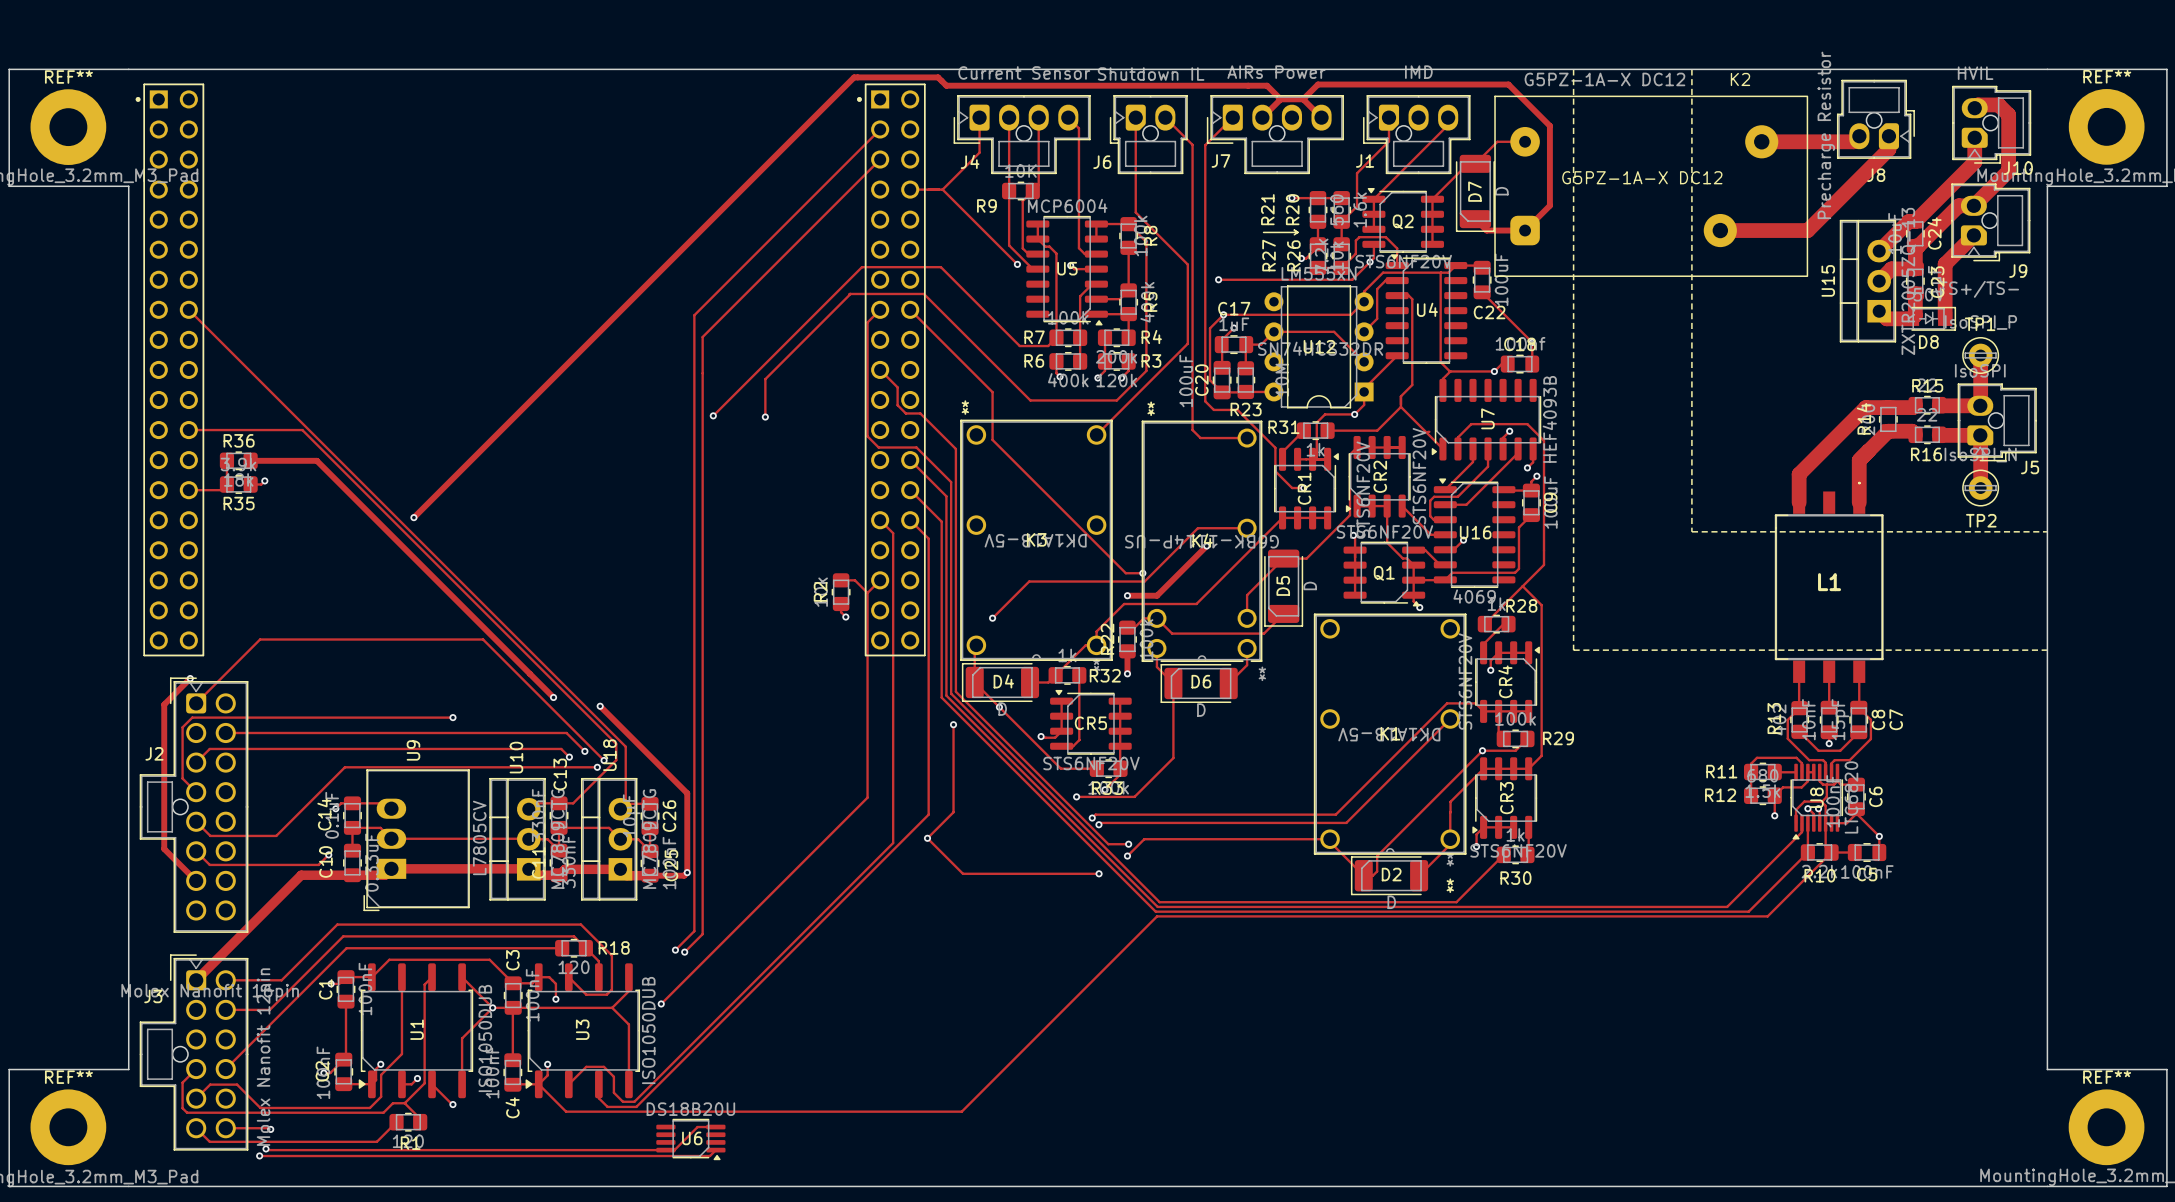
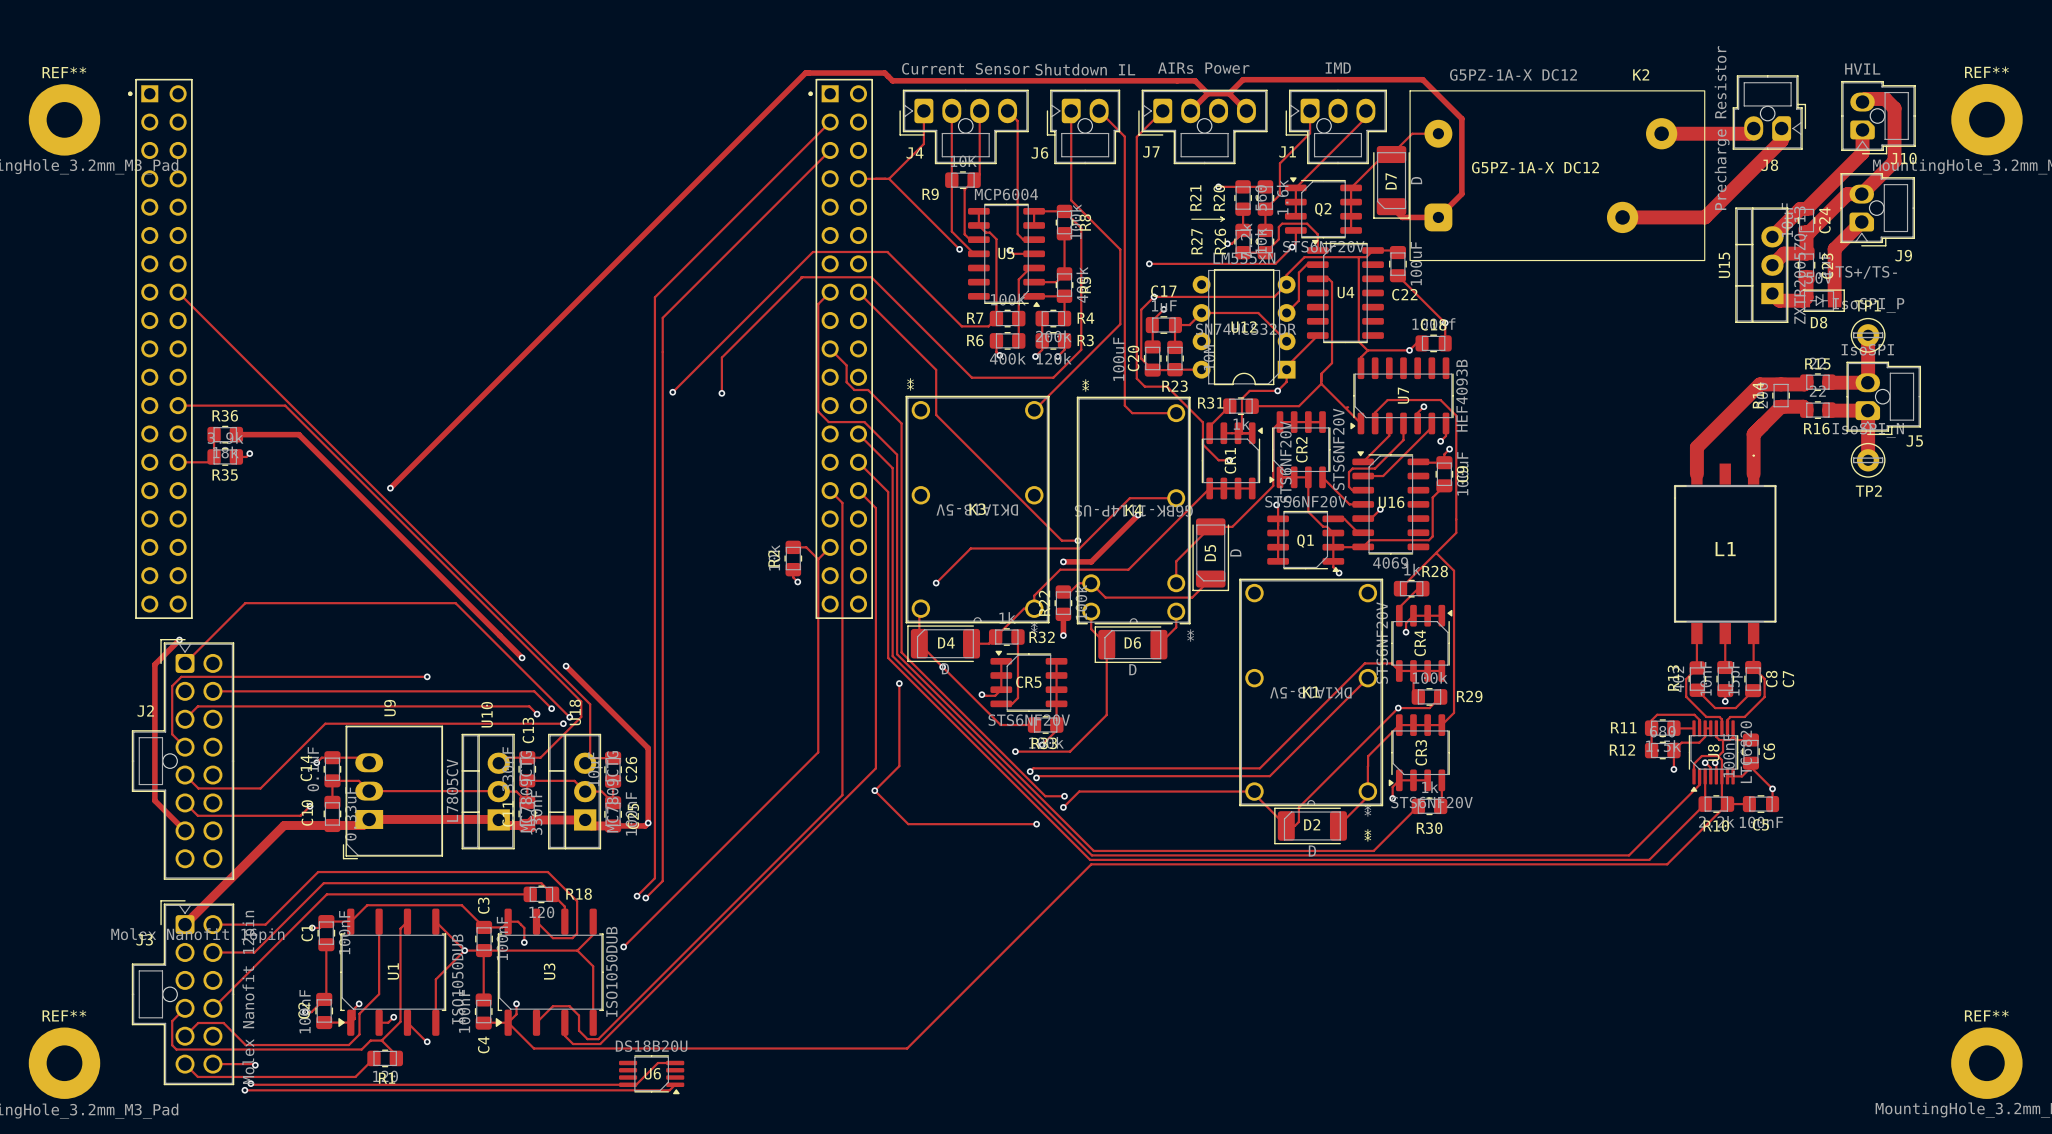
board edge: (9, 69) (9, 186) (128, 186) (128, 1069) (9, 1069) (9, 1186) (2166, 1186) (2166, 1069) (2047, 1069) (2047, 186) (2166, 186) (2166, 69) (9, 69) -> none
line: (1573, 69) (1573, 650) (2047, 650) -> none
line: (1691, 69) (1691, 531) (2047, 531) -> none

